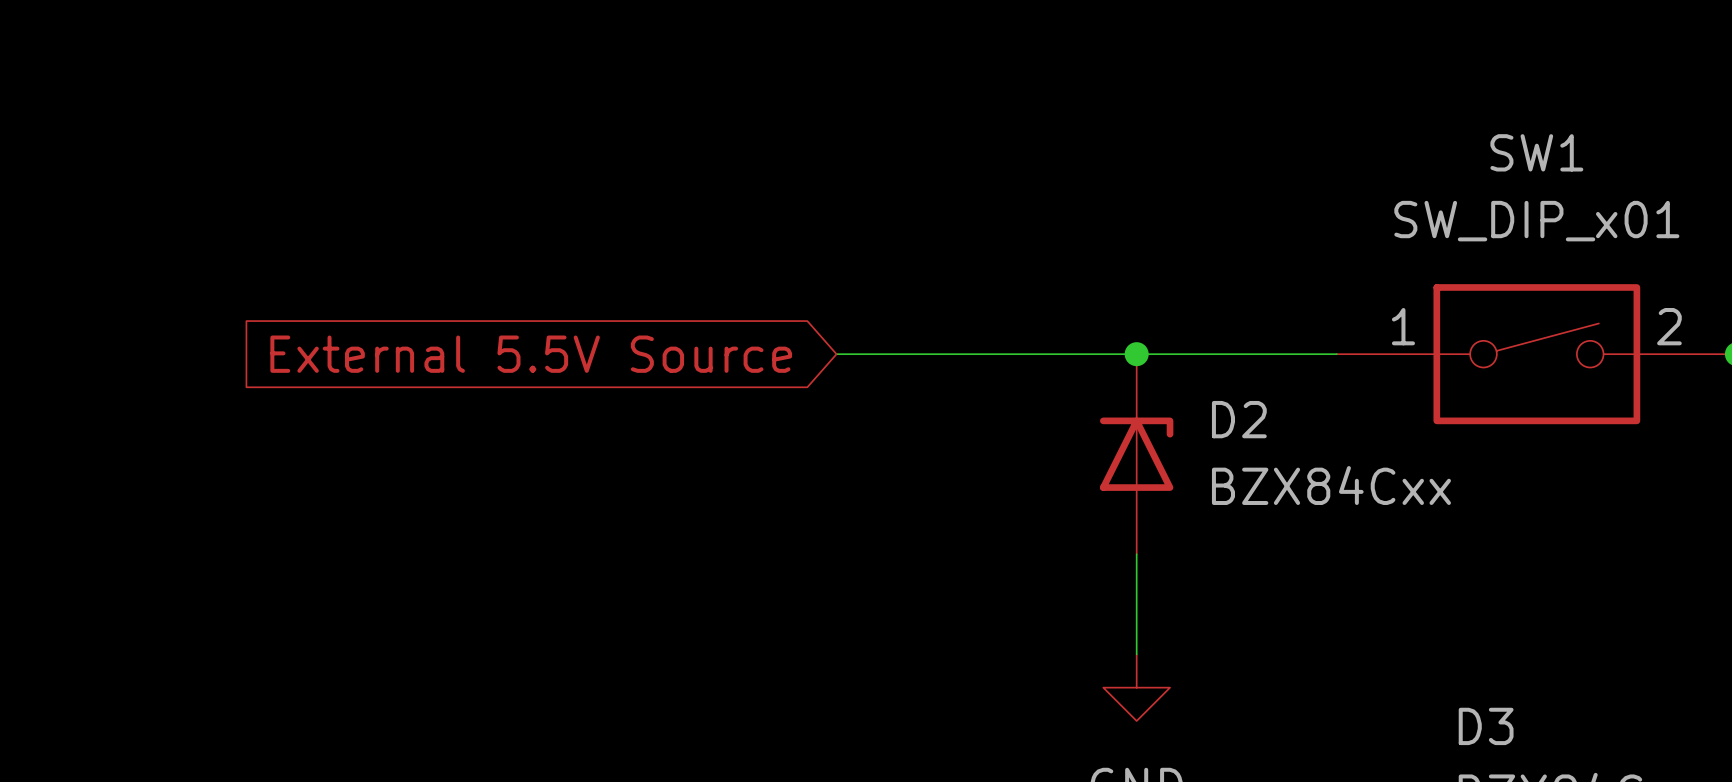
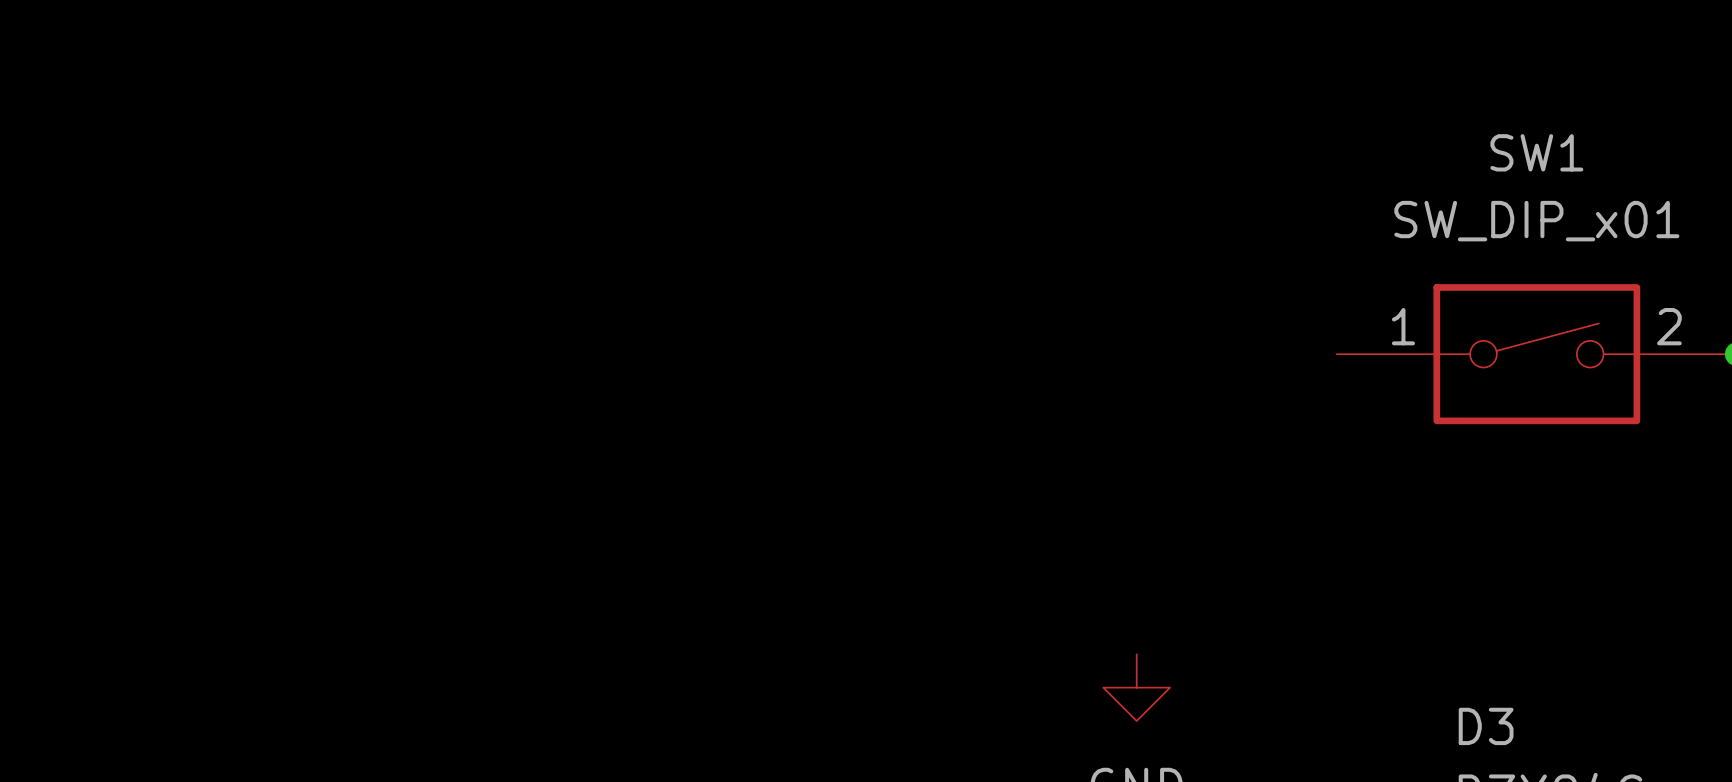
global label: External 5.5V Source (531, 354) -> none
wire: (836, 354) (1336, 354) -> none
junction: (1136, 354) -> none
D2: BZX84Cxx (1136, 454) -> none
wire: (1136, 554) (1136, 654) -> none

